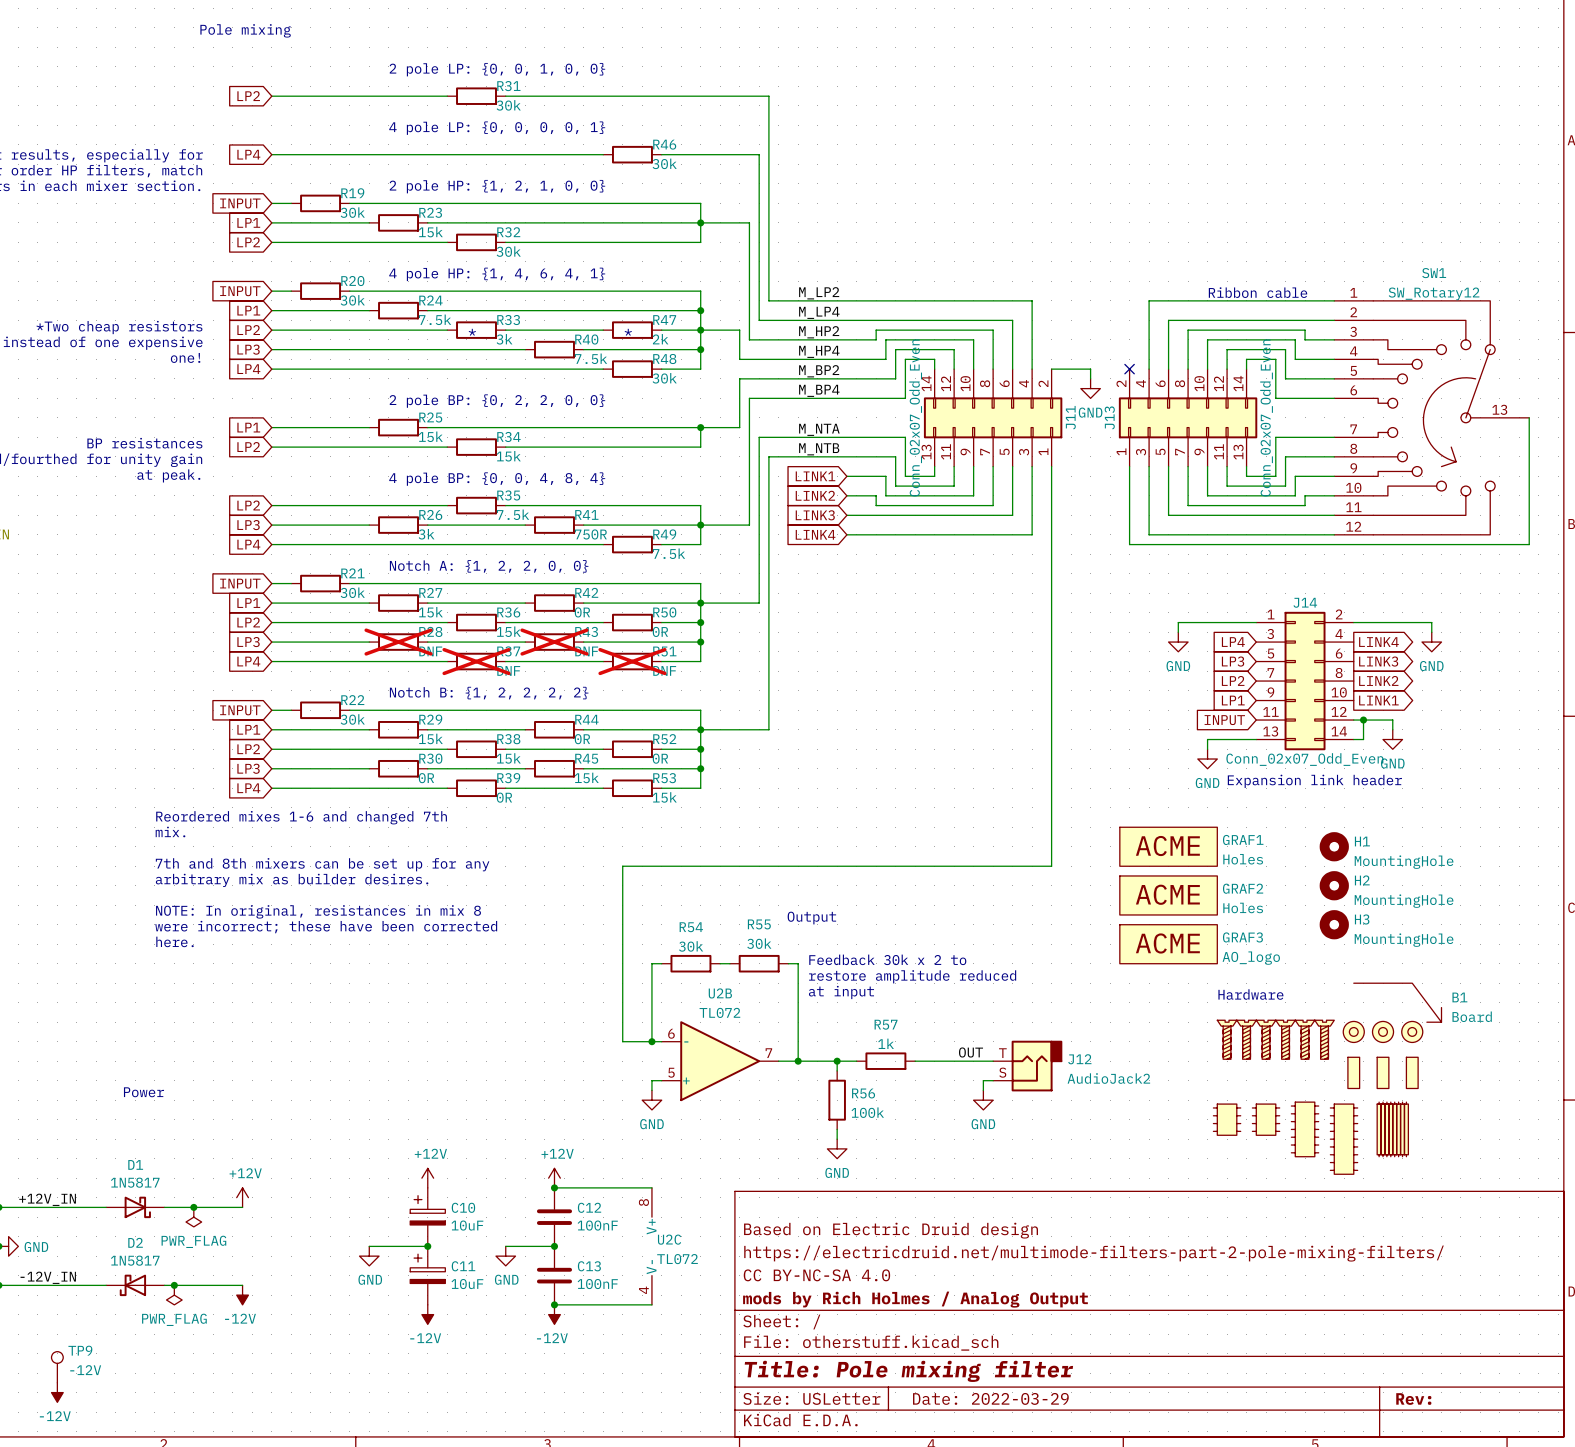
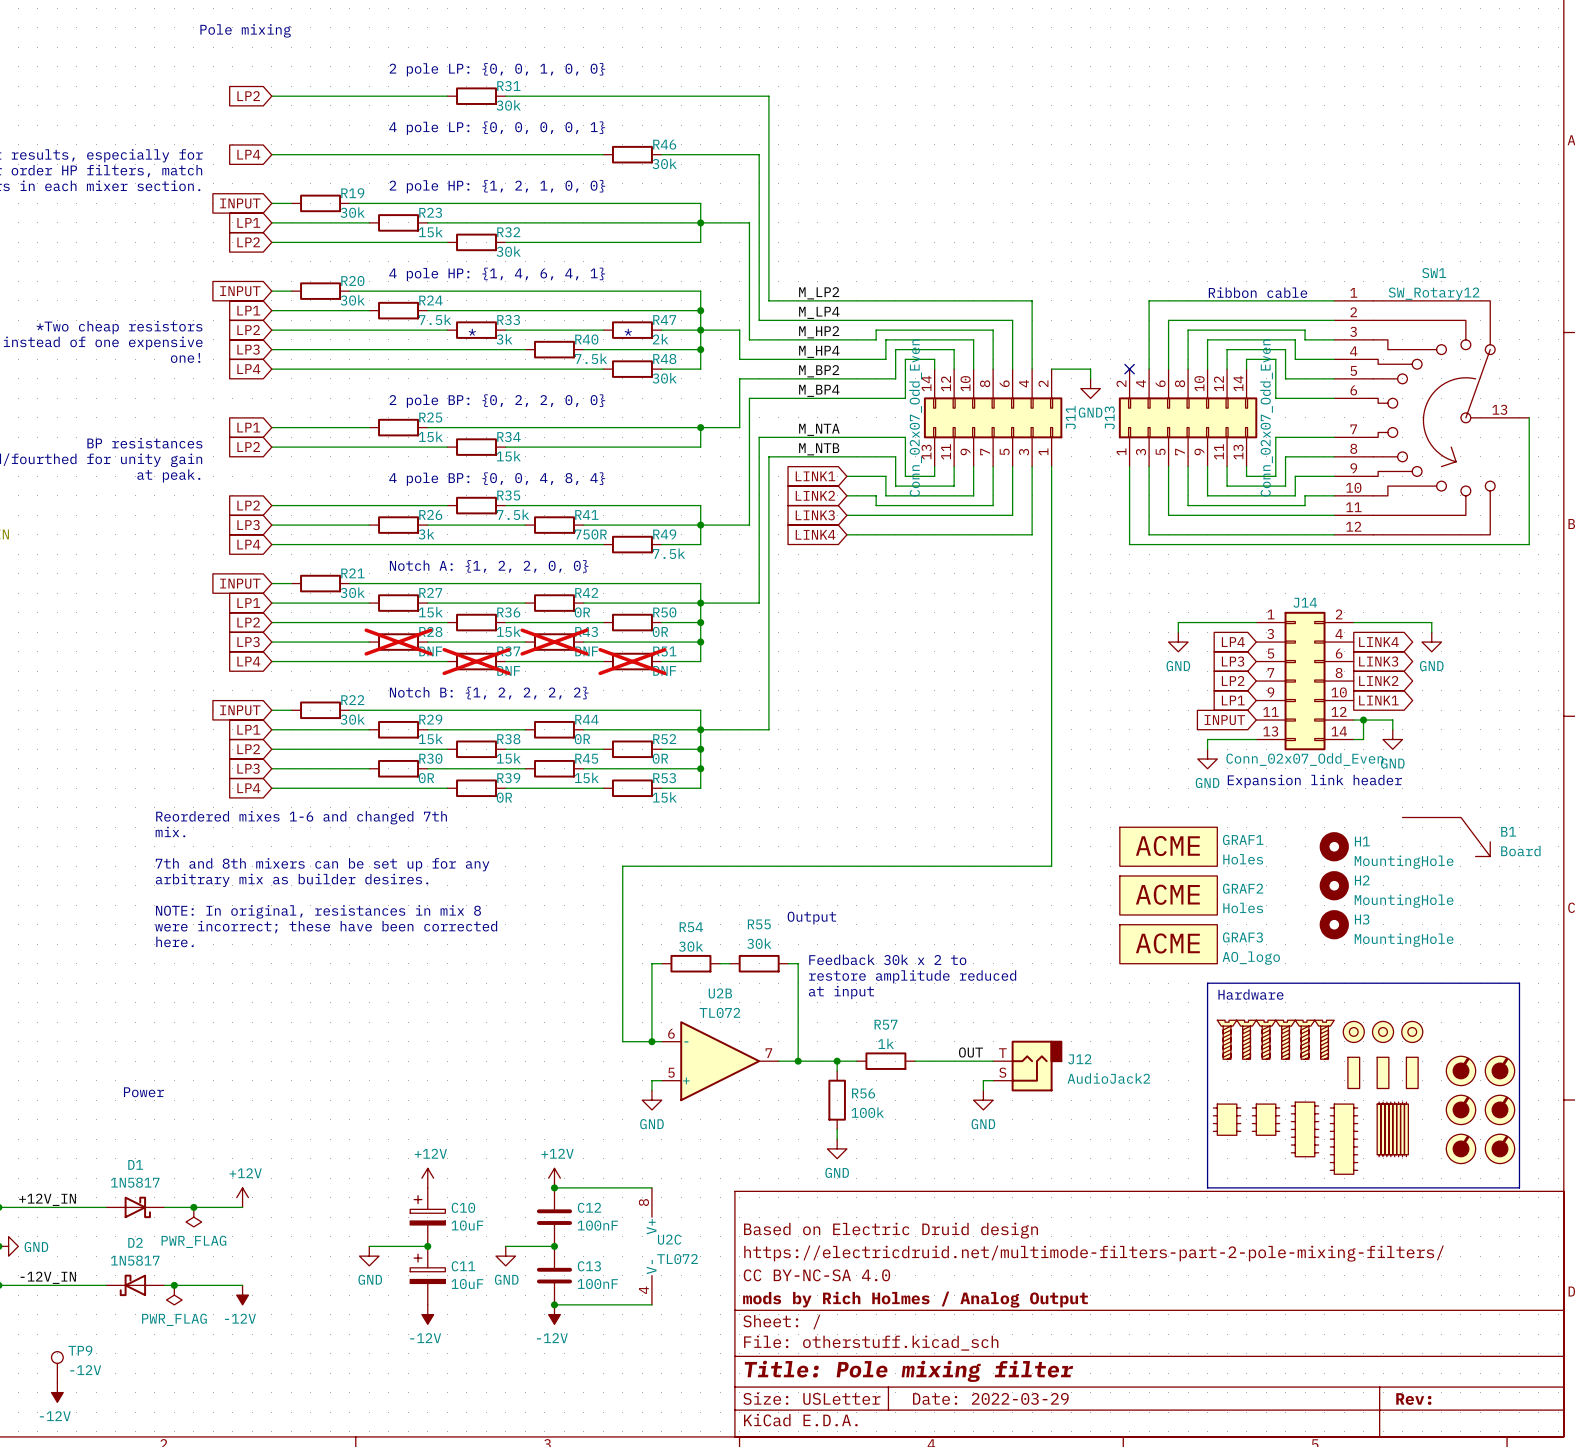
line: none -> (1207, 983) (1519, 983) (1519, 1187) (1207, 1187) (1207, 983)
B1 position: (1397, 1002) -> (1446, 836)
part: none -> (1460, 1070)
part: none -> (1499, 1070)
part: none -> (1460, 1109)
part: none -> (1499, 1109)
part: none -> (1460, 1148)
part: none -> (1499, 1148)

